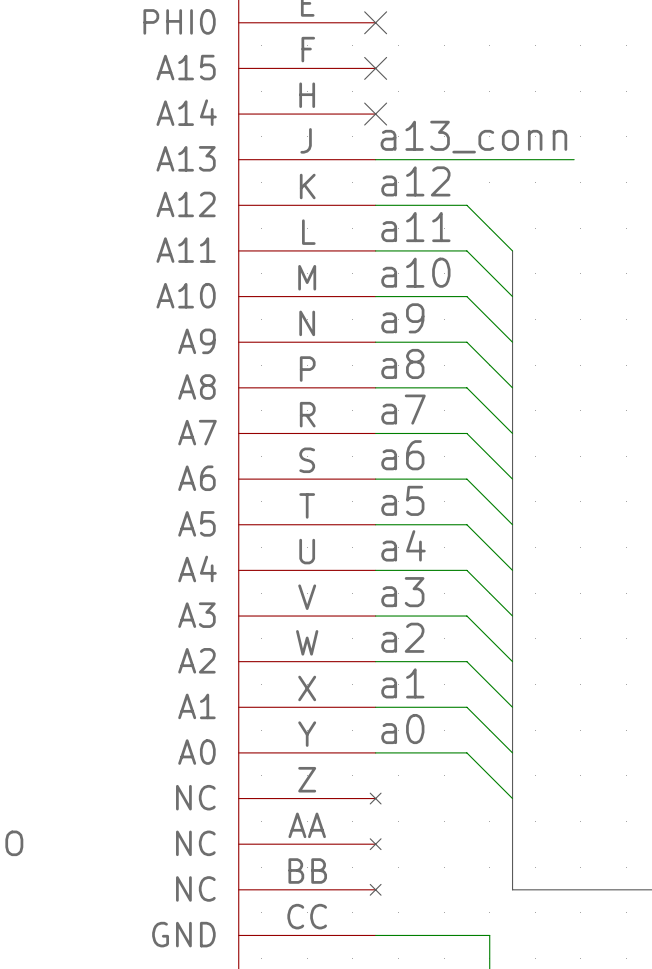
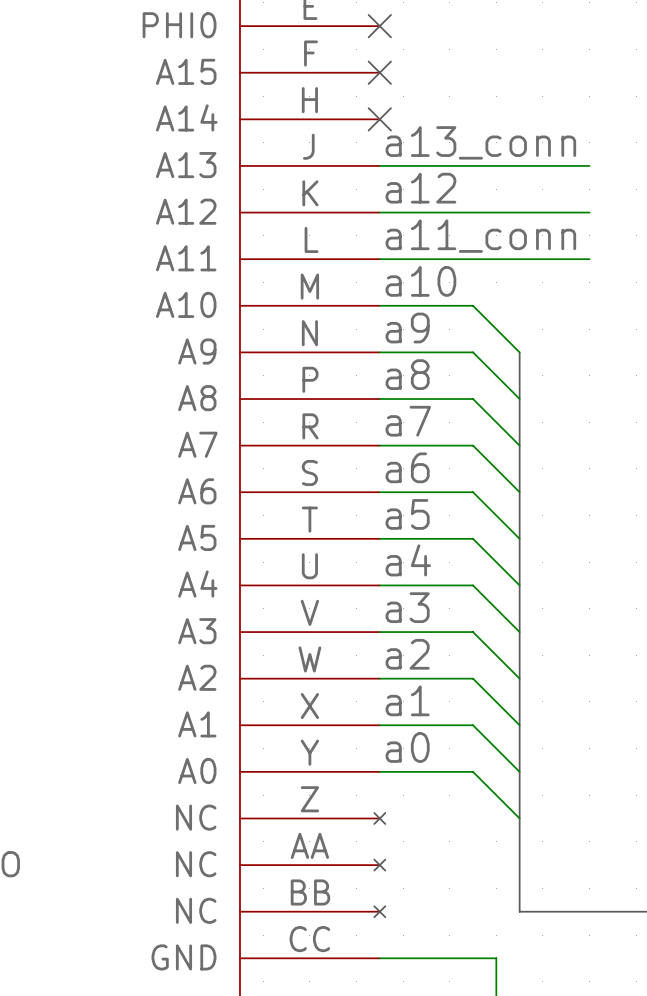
label position: a13_conn (473, 137) -> a13_conn (480, 142)
wire: none -> (582, 165) (589, 165)
wire: (466, 205) (512, 250) -> (473, 212) (589, 212)
label: a11 (415, 227) -> a11_conn (480, 236)
wire: (466, 250) (512, 296) -> (473, 259) (589, 259)
bus: (512, 250) (512, 342) -> none

